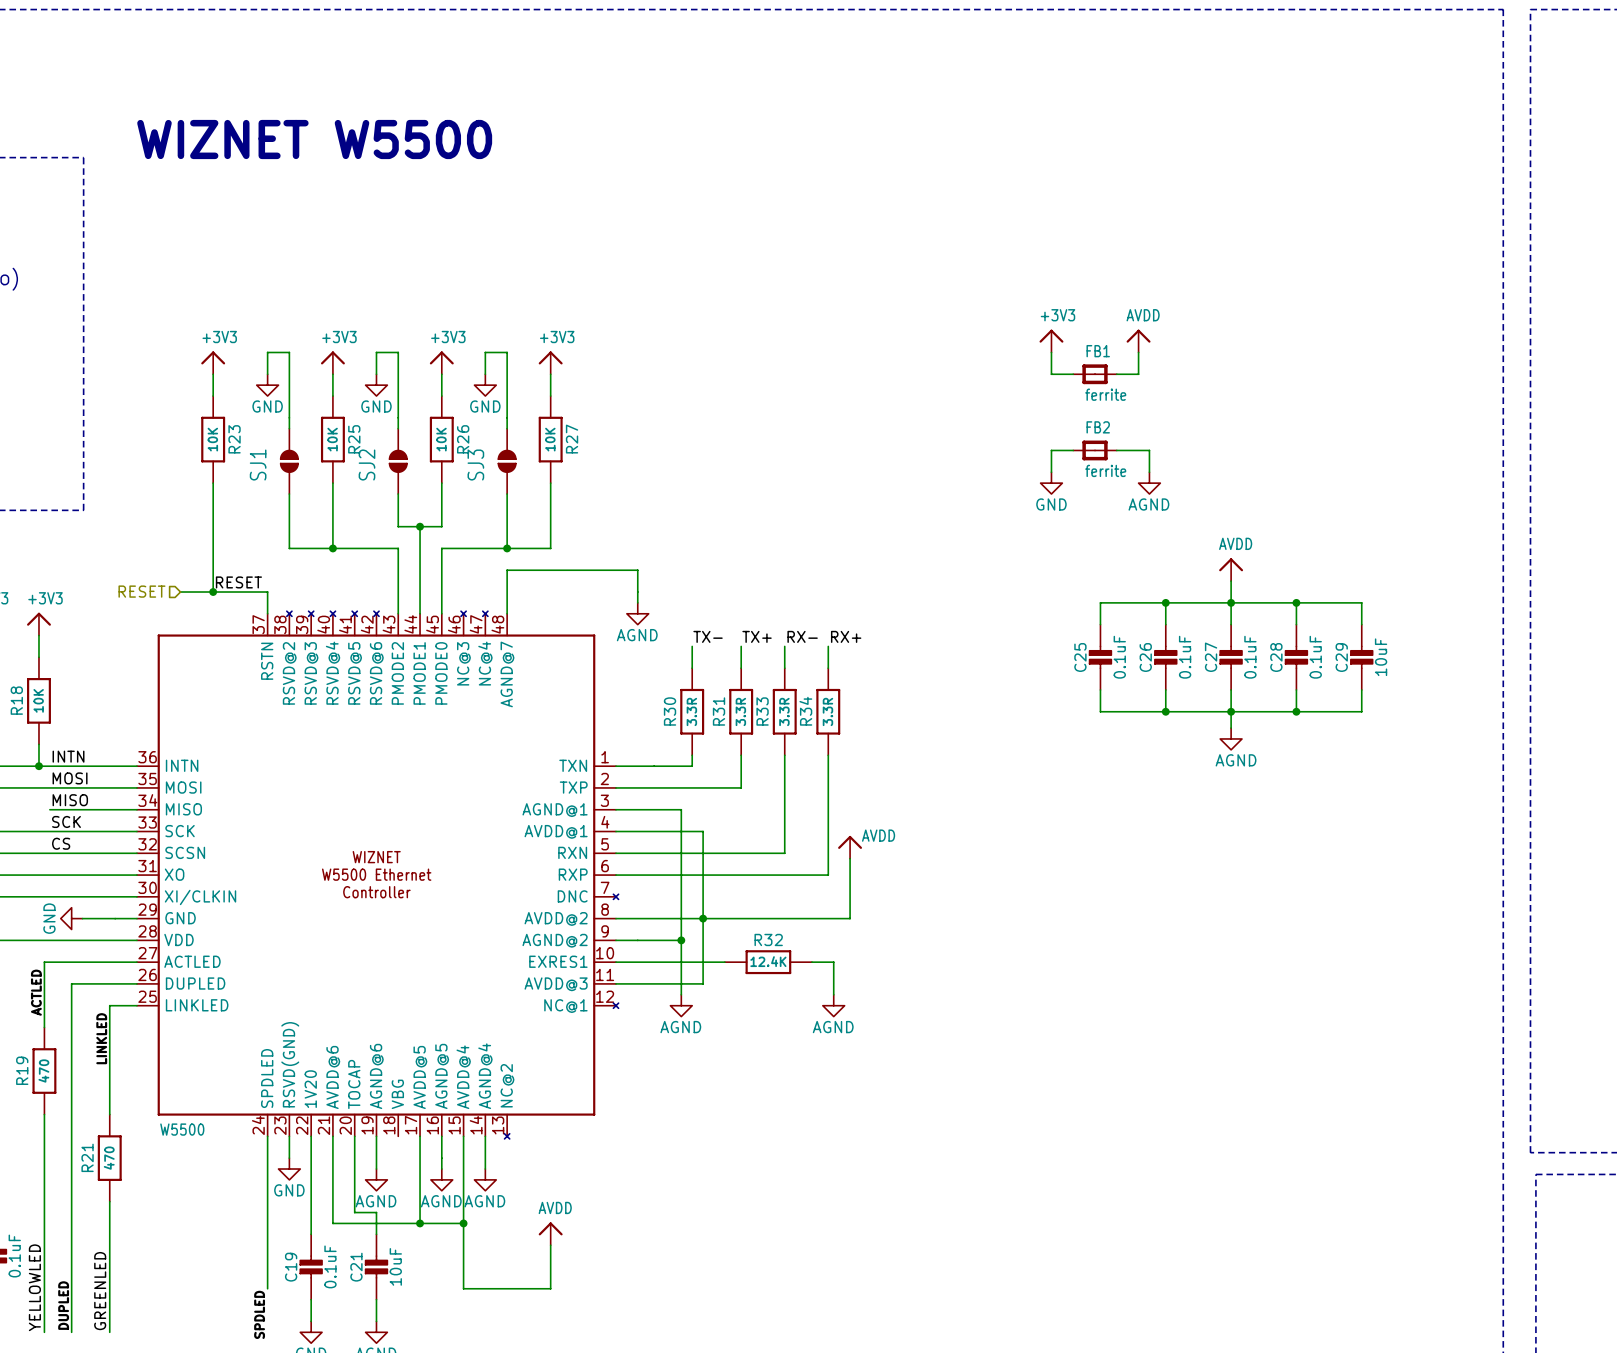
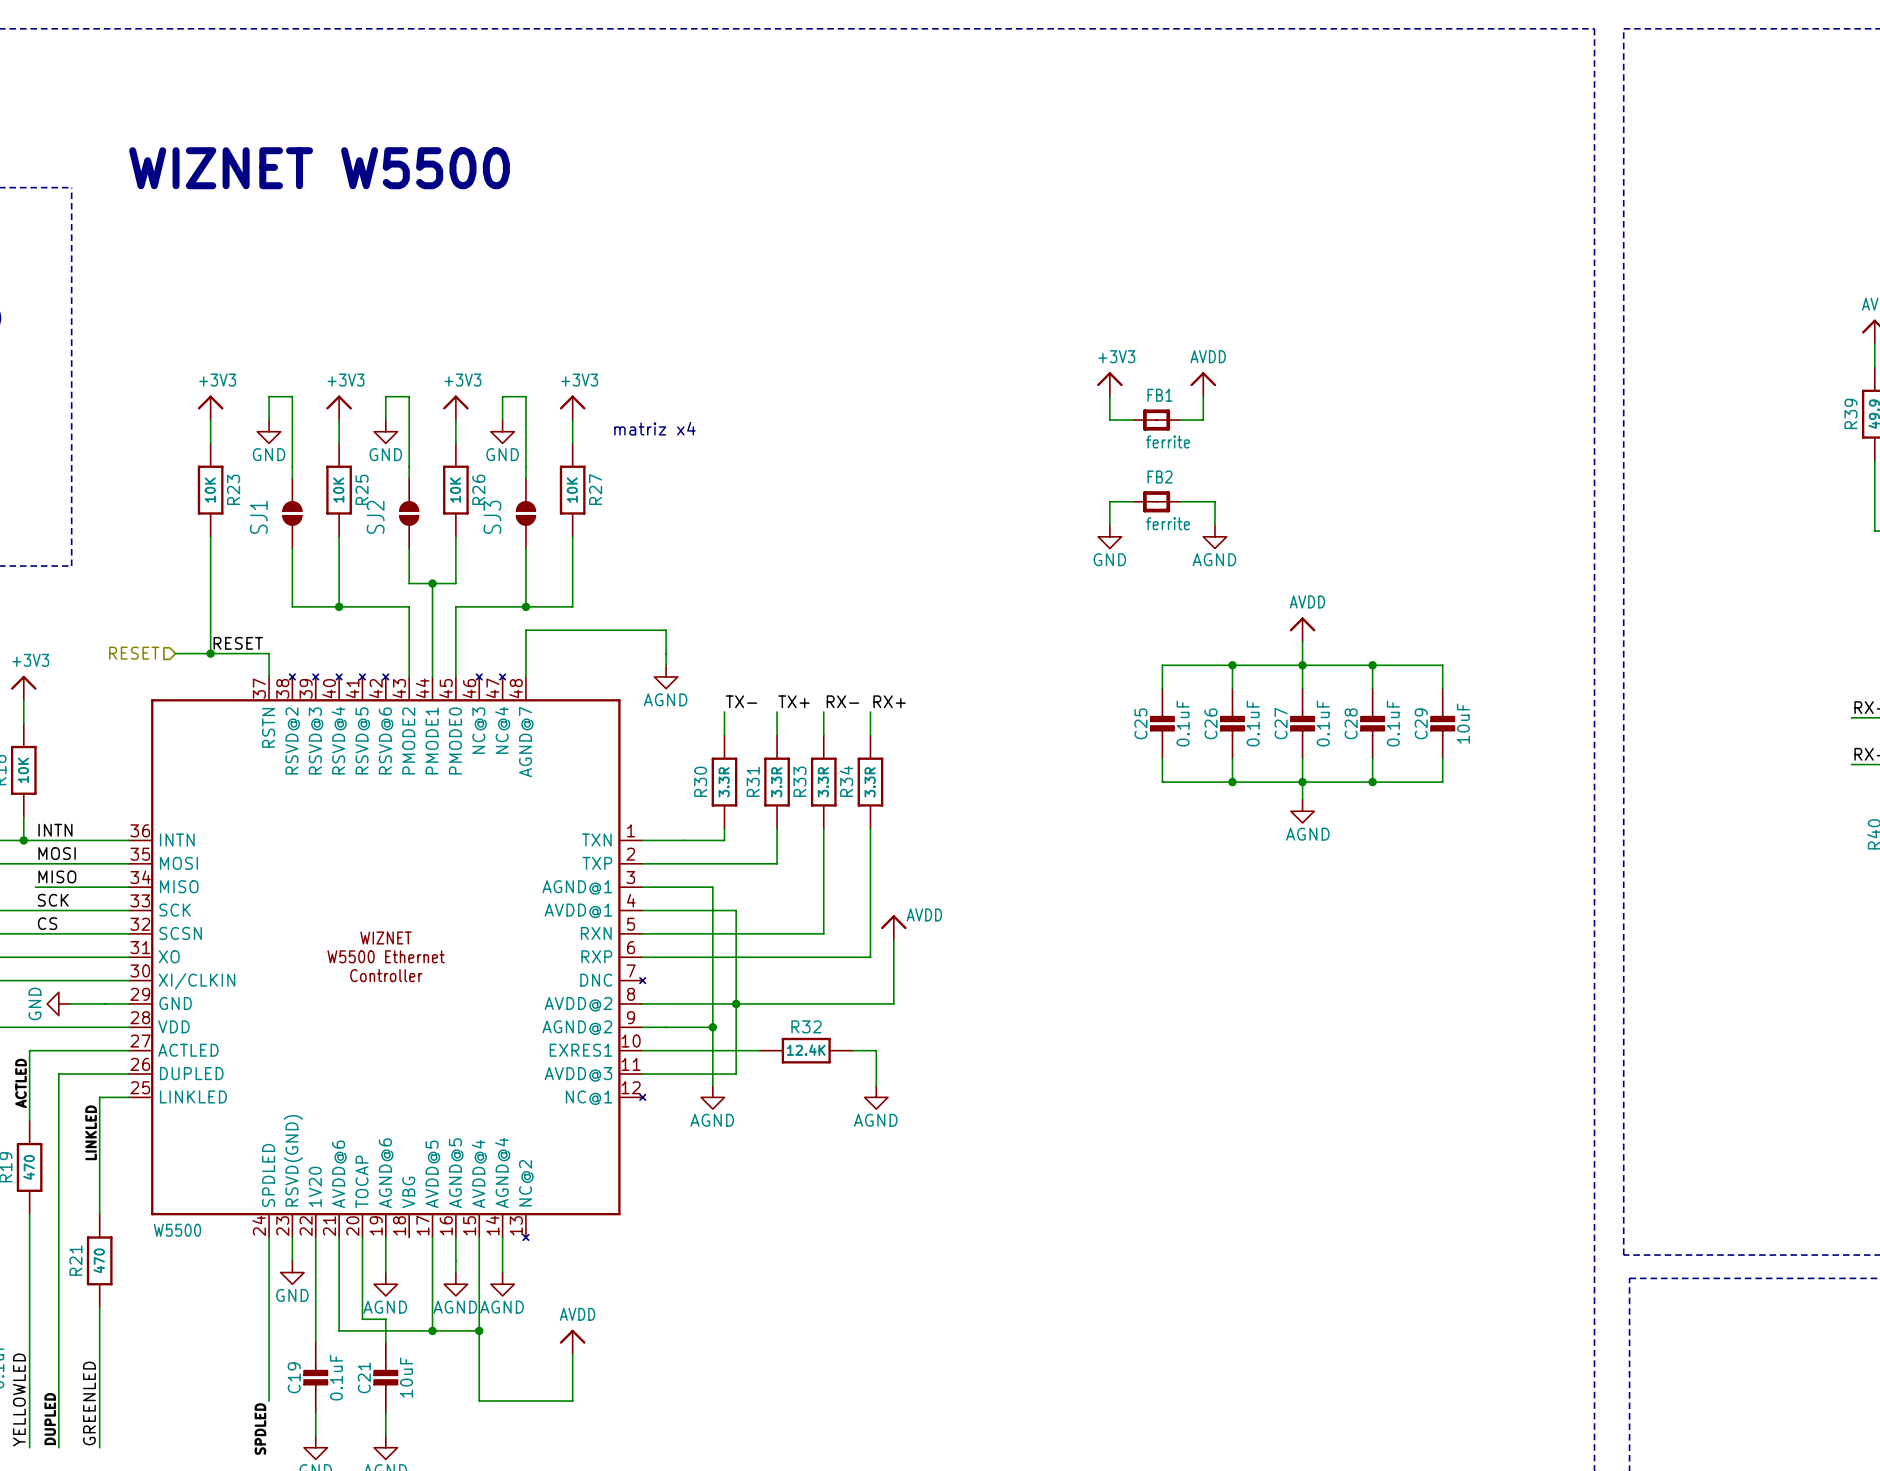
text: none -> matriz x4 (654, 428)

